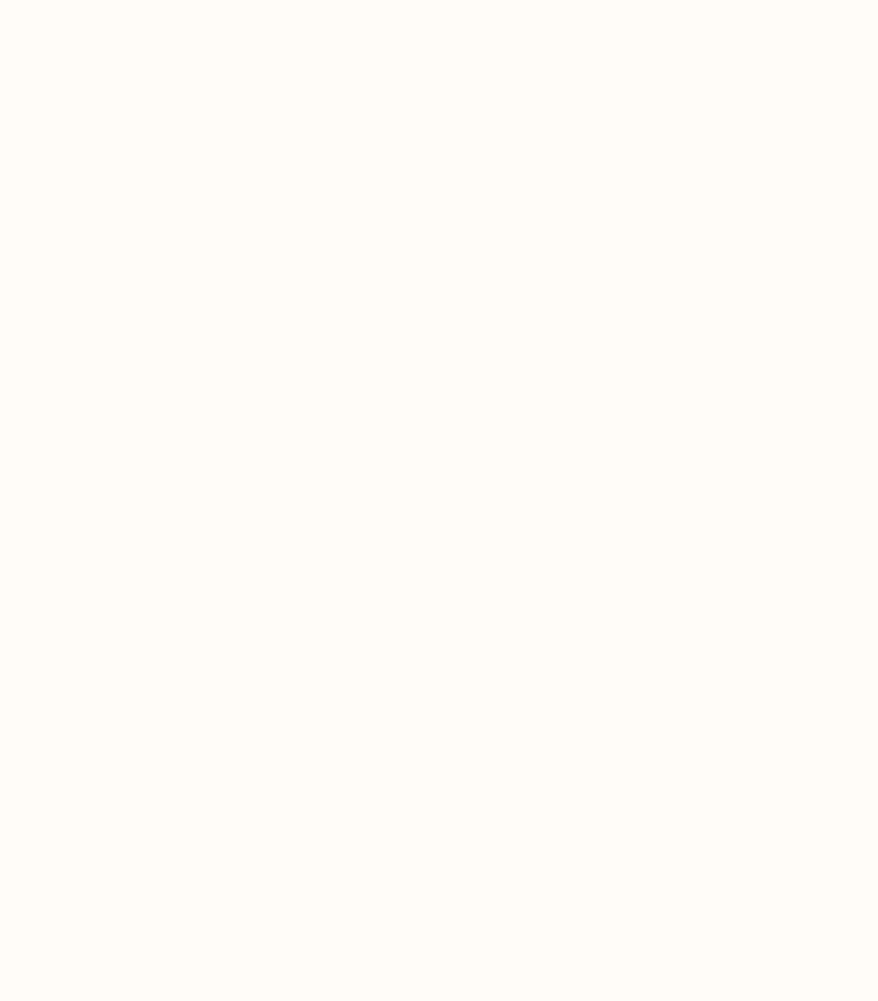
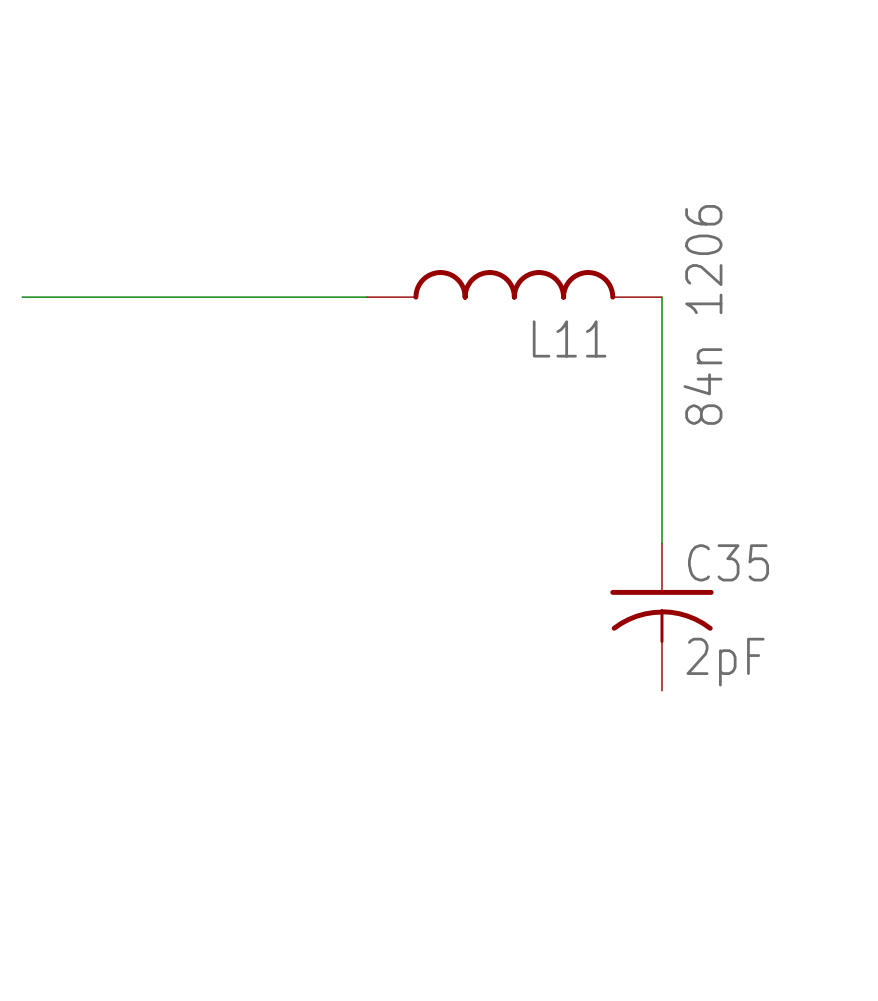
L11: none -> 84n 1206 (514, 284)
wire: none -> (22, 297) (366, 297)
wire: none -> (661, 297) (661, 543)
C35: none -> 2pF (661, 617)

